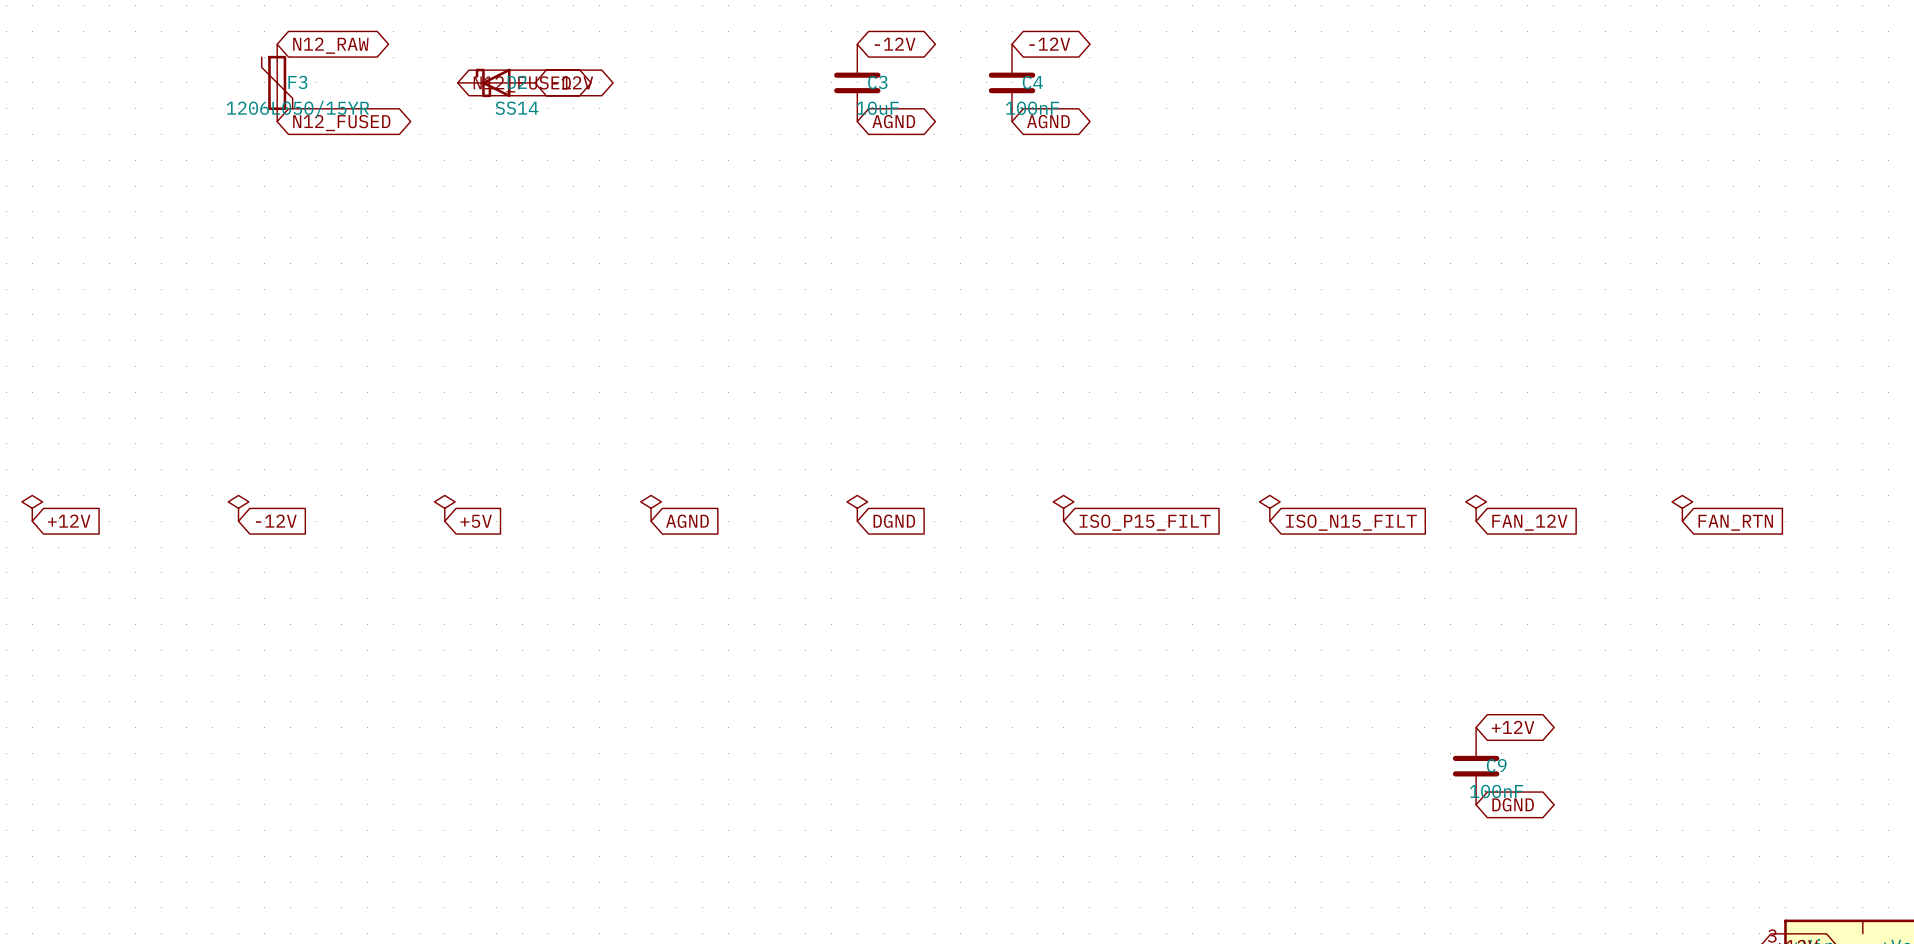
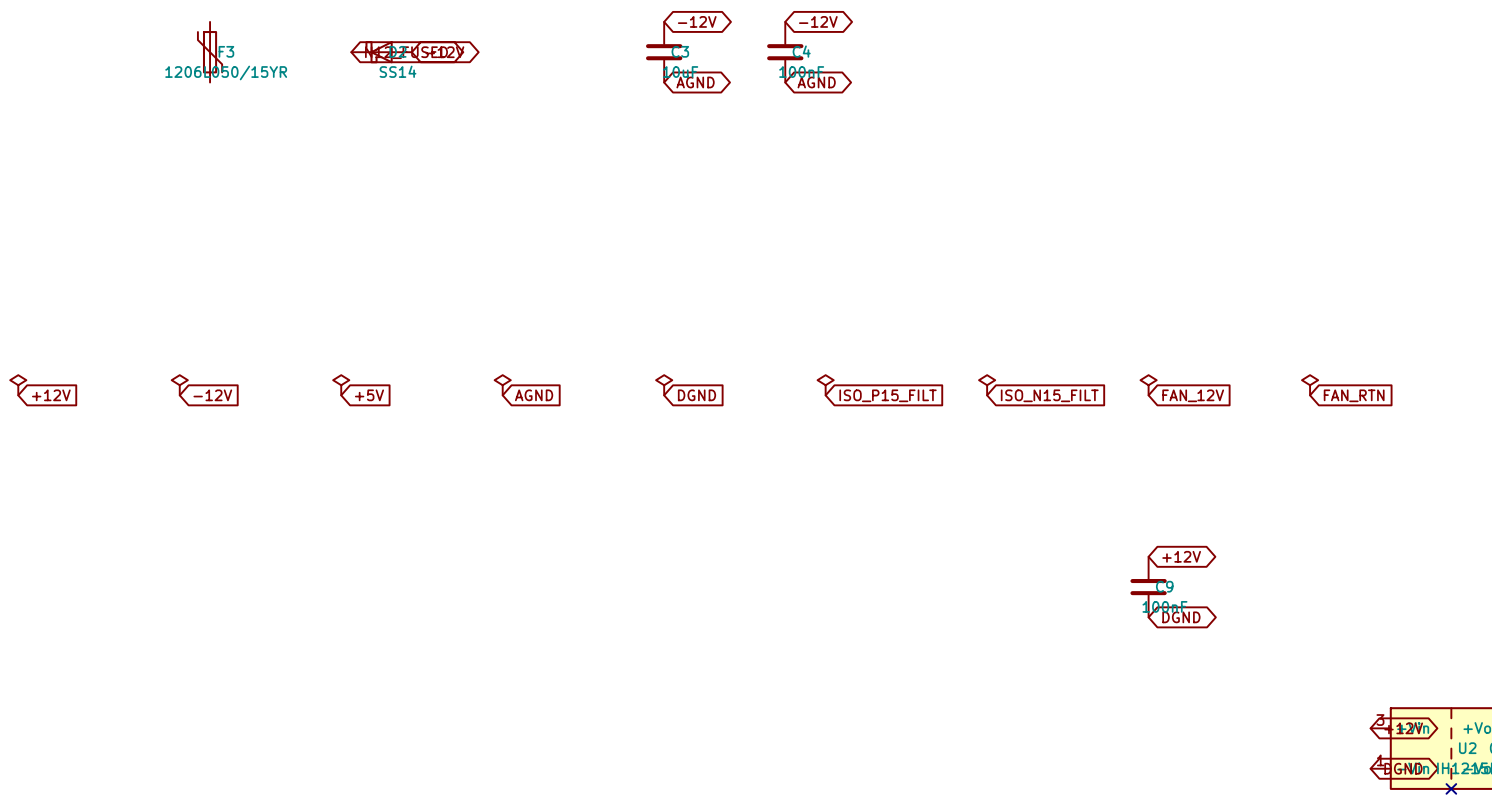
global label: N12_RAW (330, 45) -> none
global label: N12_FUSED (341, 123) -> none

